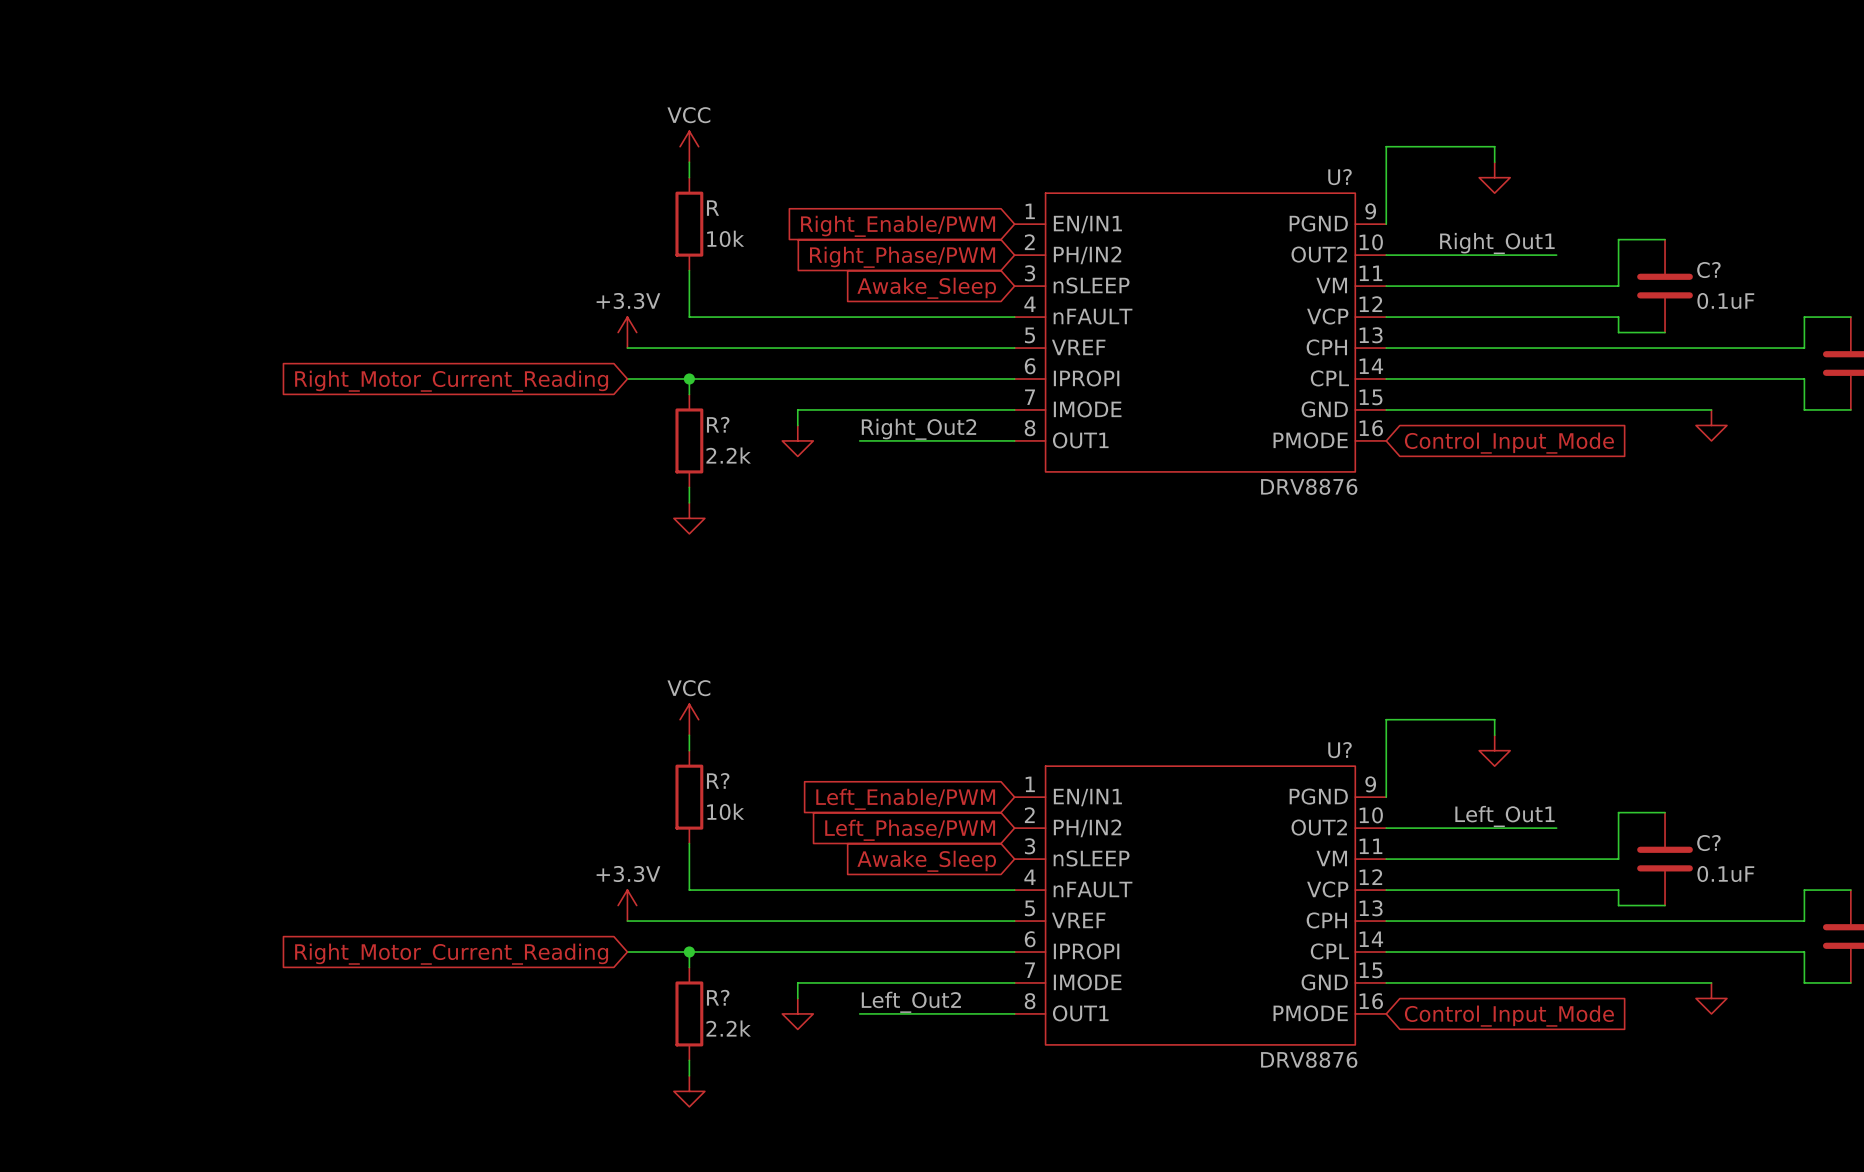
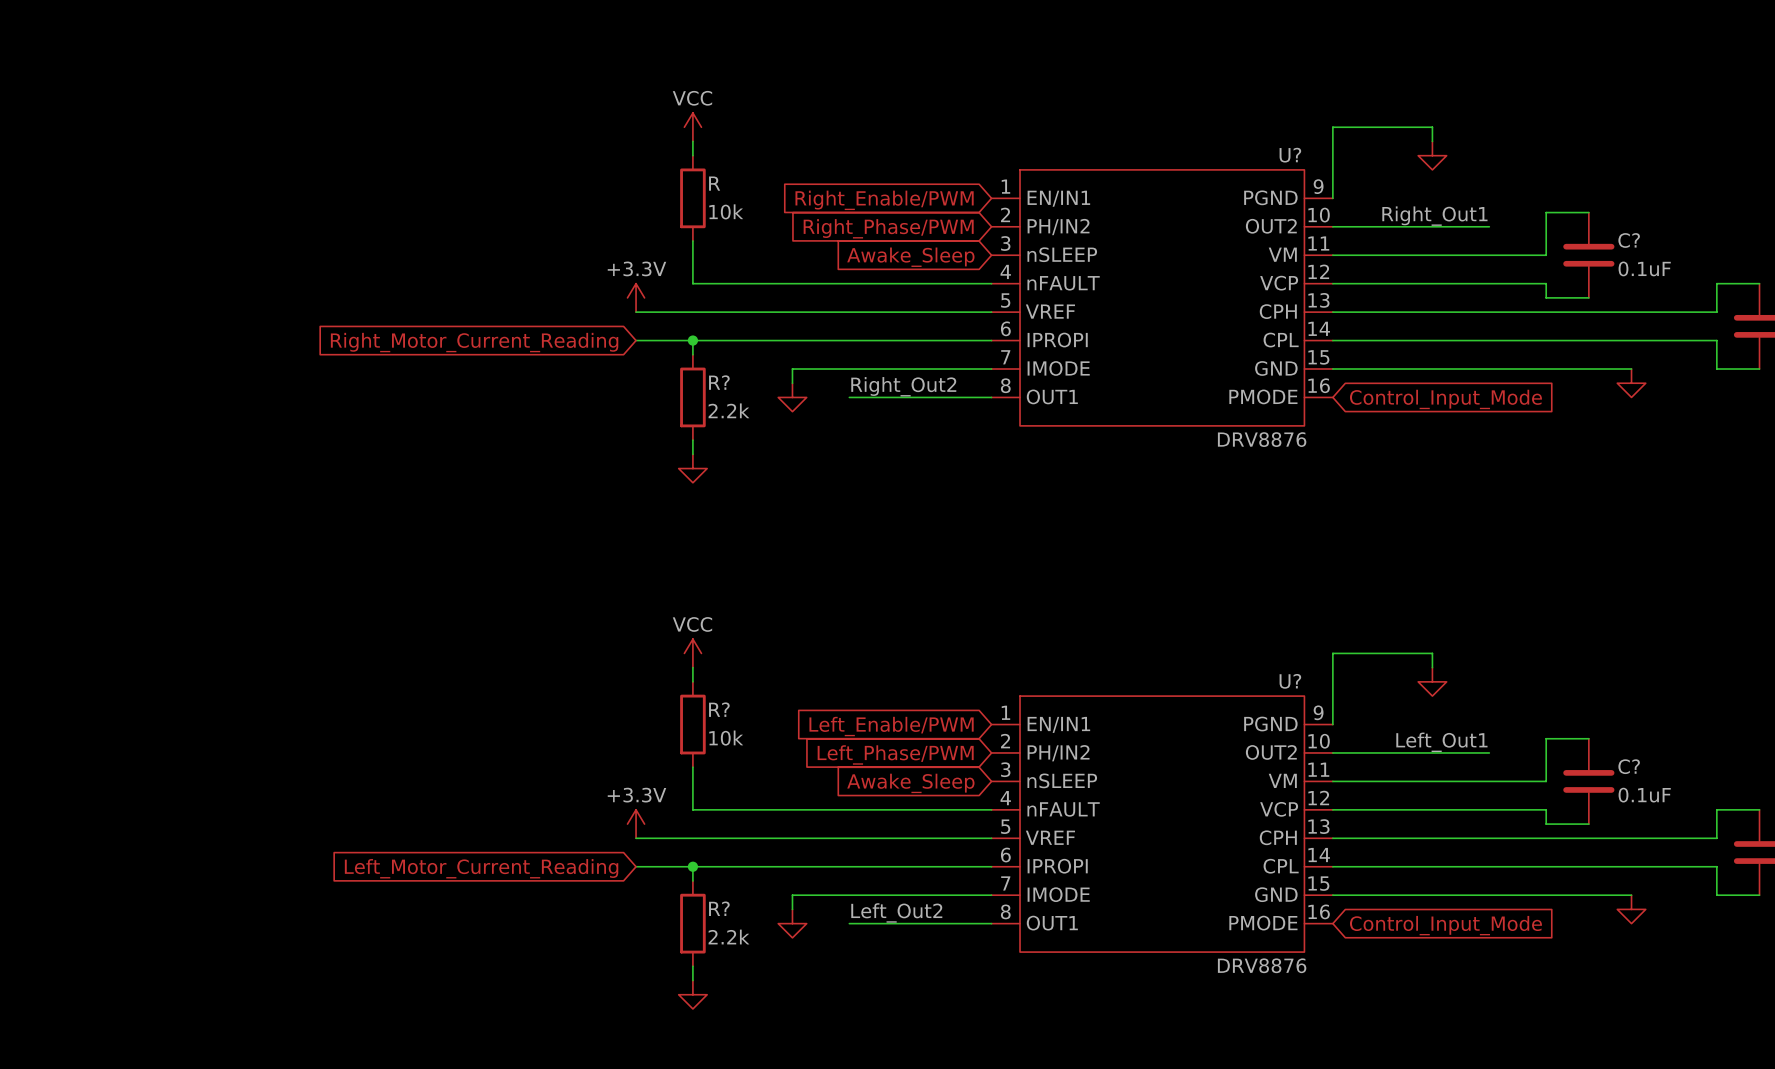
global label: Right_Motor_Current_Reading (451, 954) -> Left_Motor_Current_Reading (481, 868)

